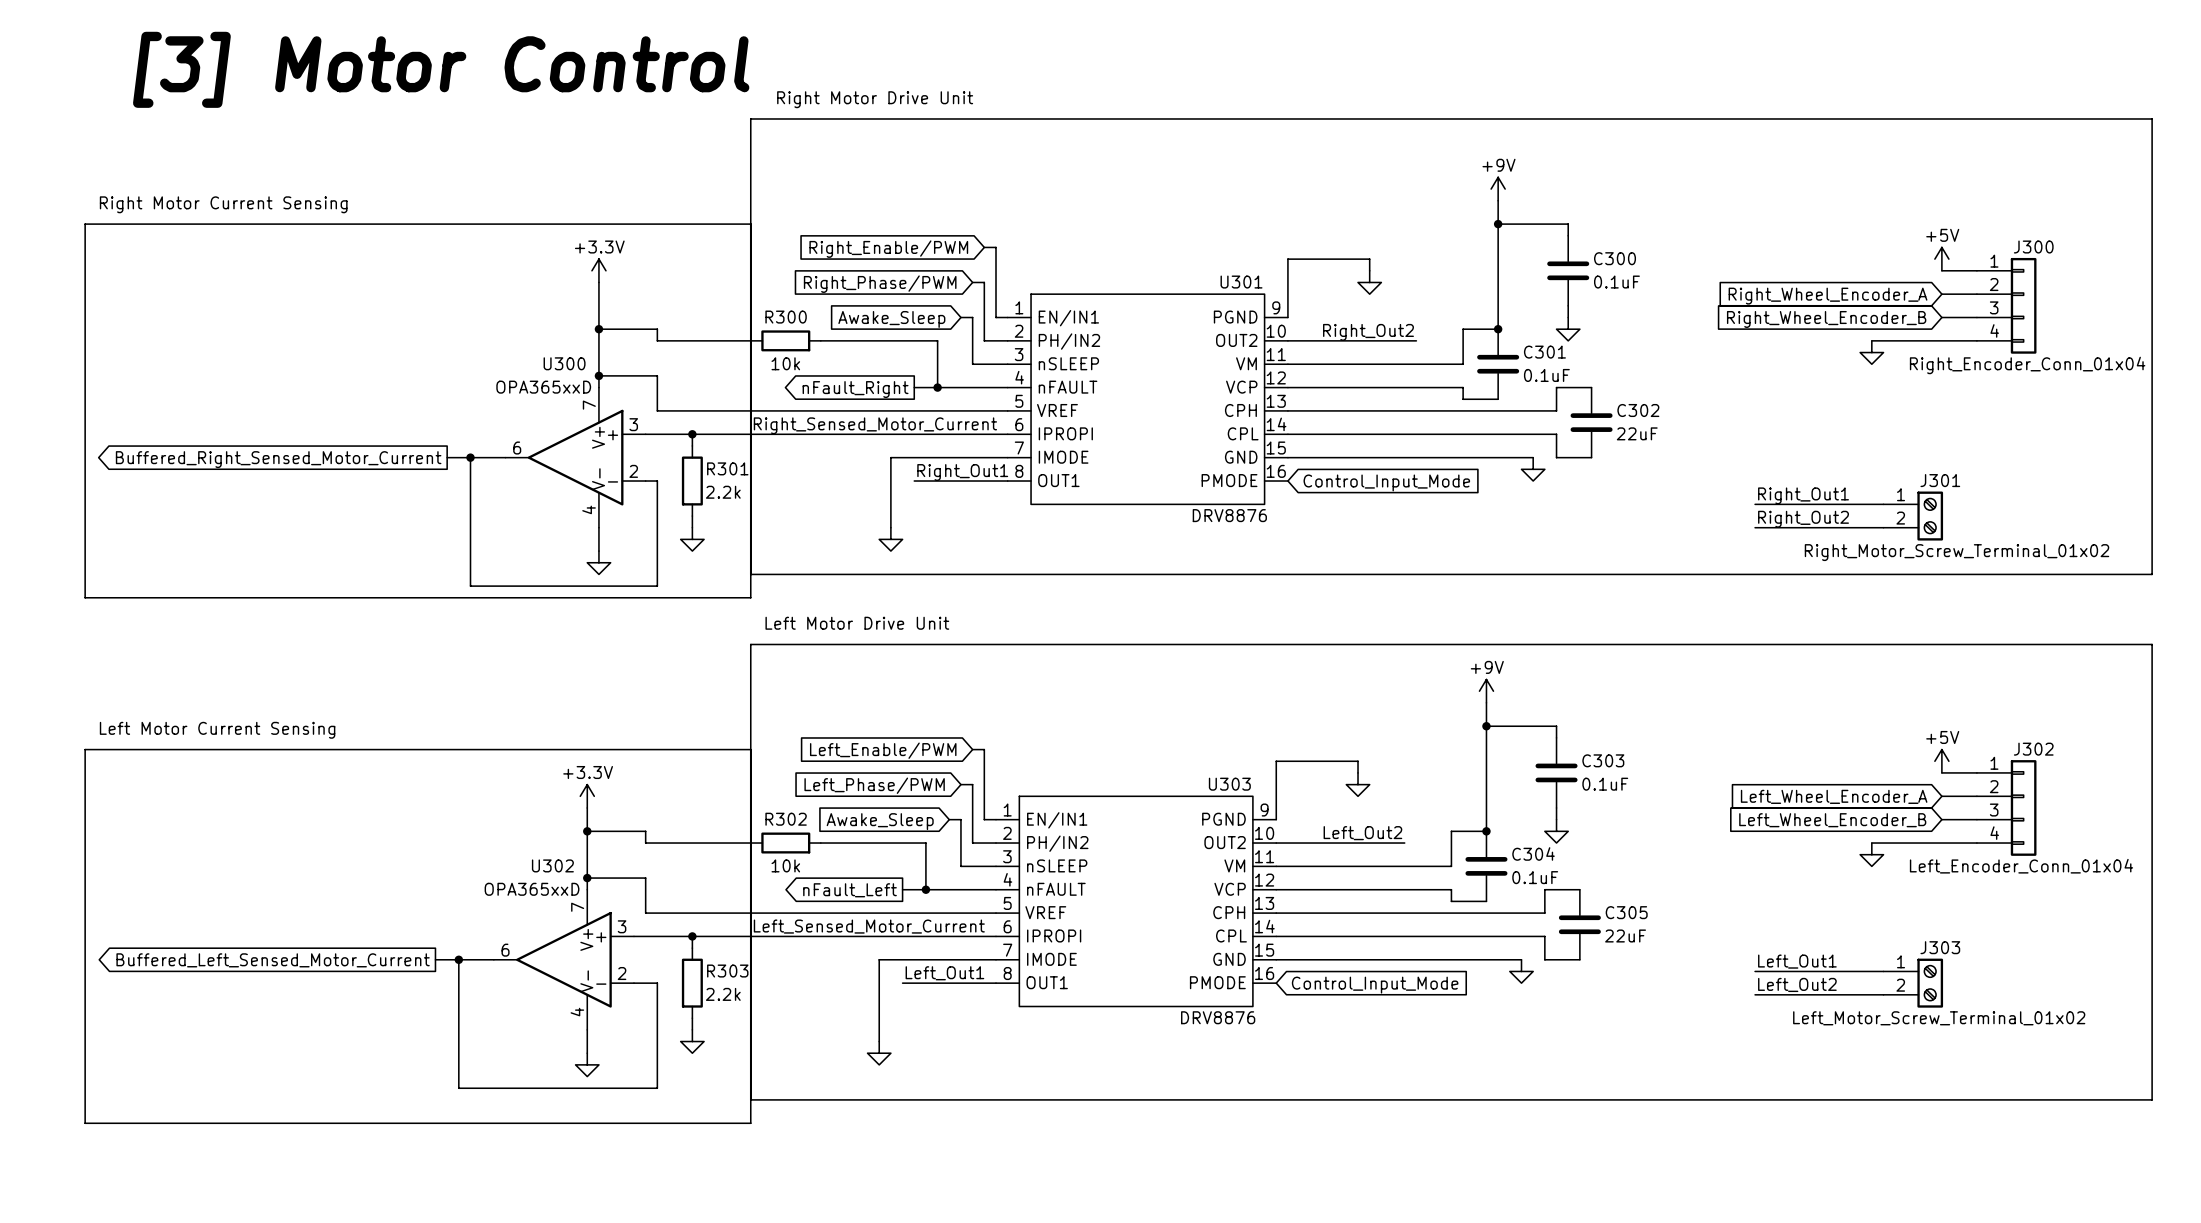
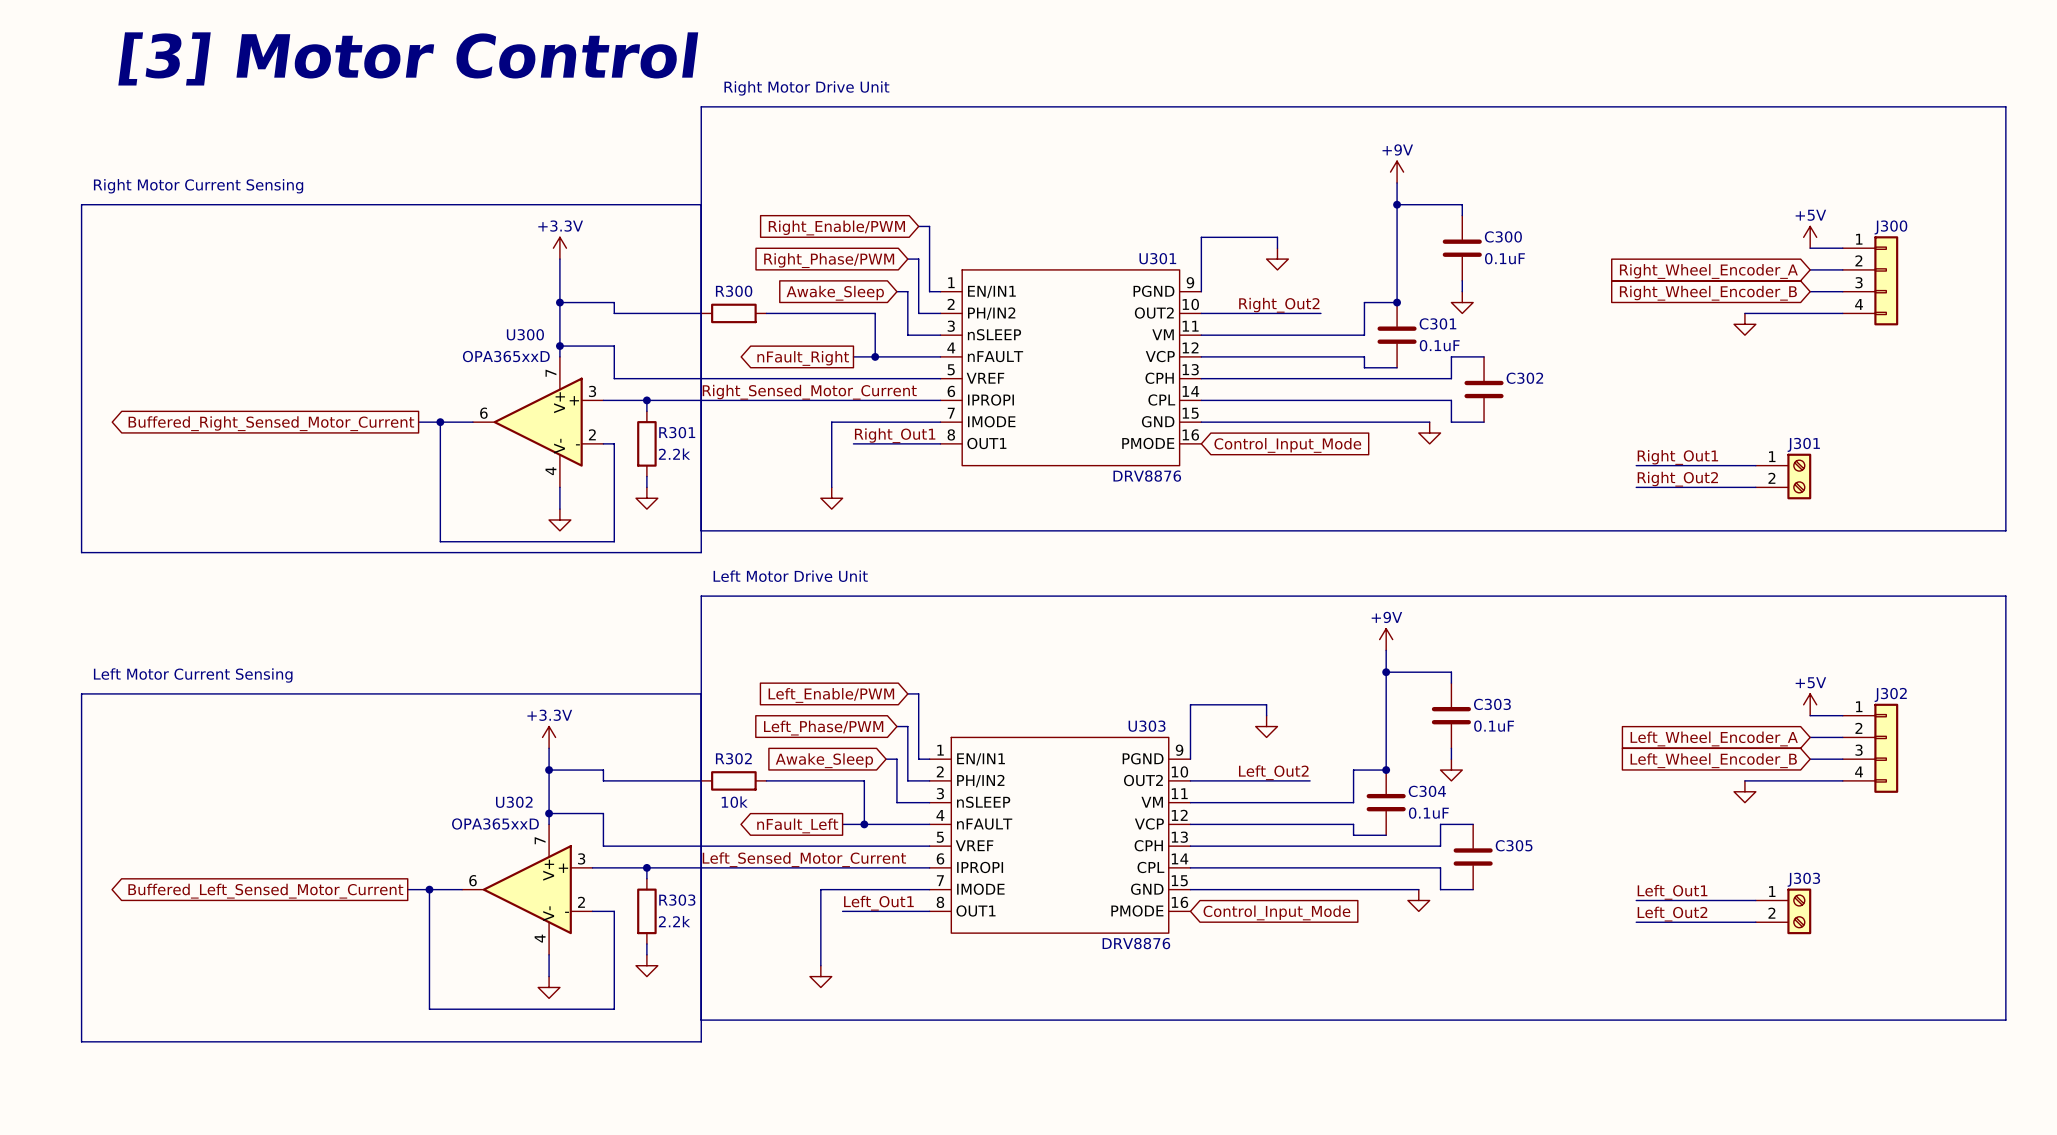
R300 value: 10k (785, 363) -> none
J300 value: Right_Encoder_Conn_01x04 (2027, 365) -> none
C302 value: 22uF (1637, 433) -> none
J301 value: Right_Motor_Screw_Terminal_01x02 (1957, 552) -> none
J302 value: Left_Encoder_Conn_01x04 (2021, 866) -> none
C305 value: 22uF (1625, 936) -> none
J303 value: Left_Motor_Screw_Terminal_01x02 (1939, 1018) -> none

